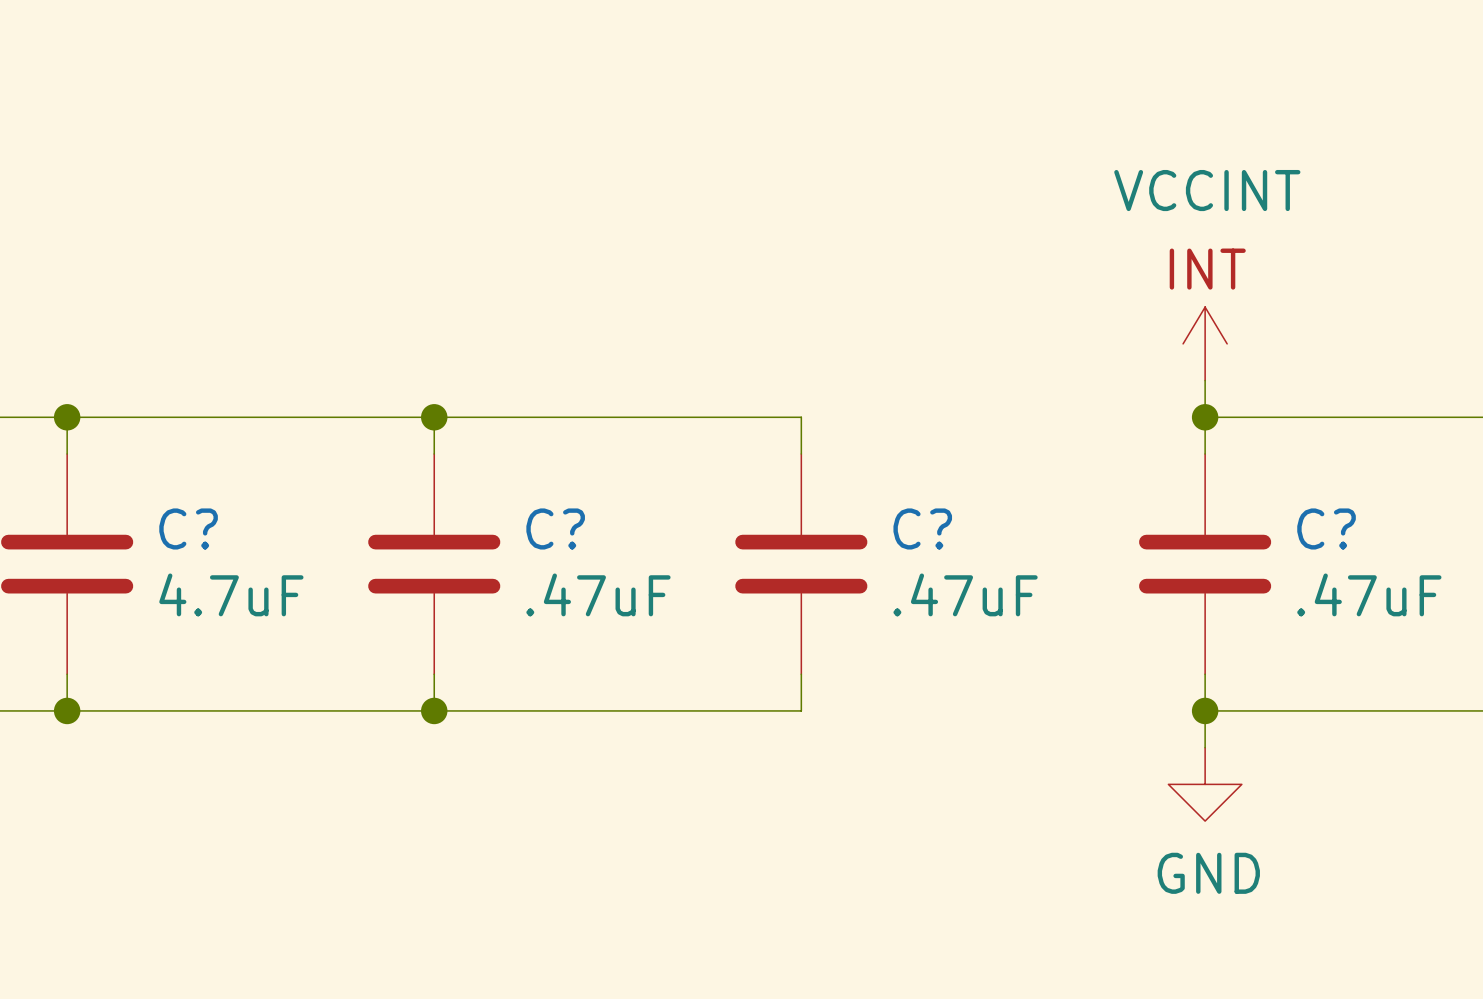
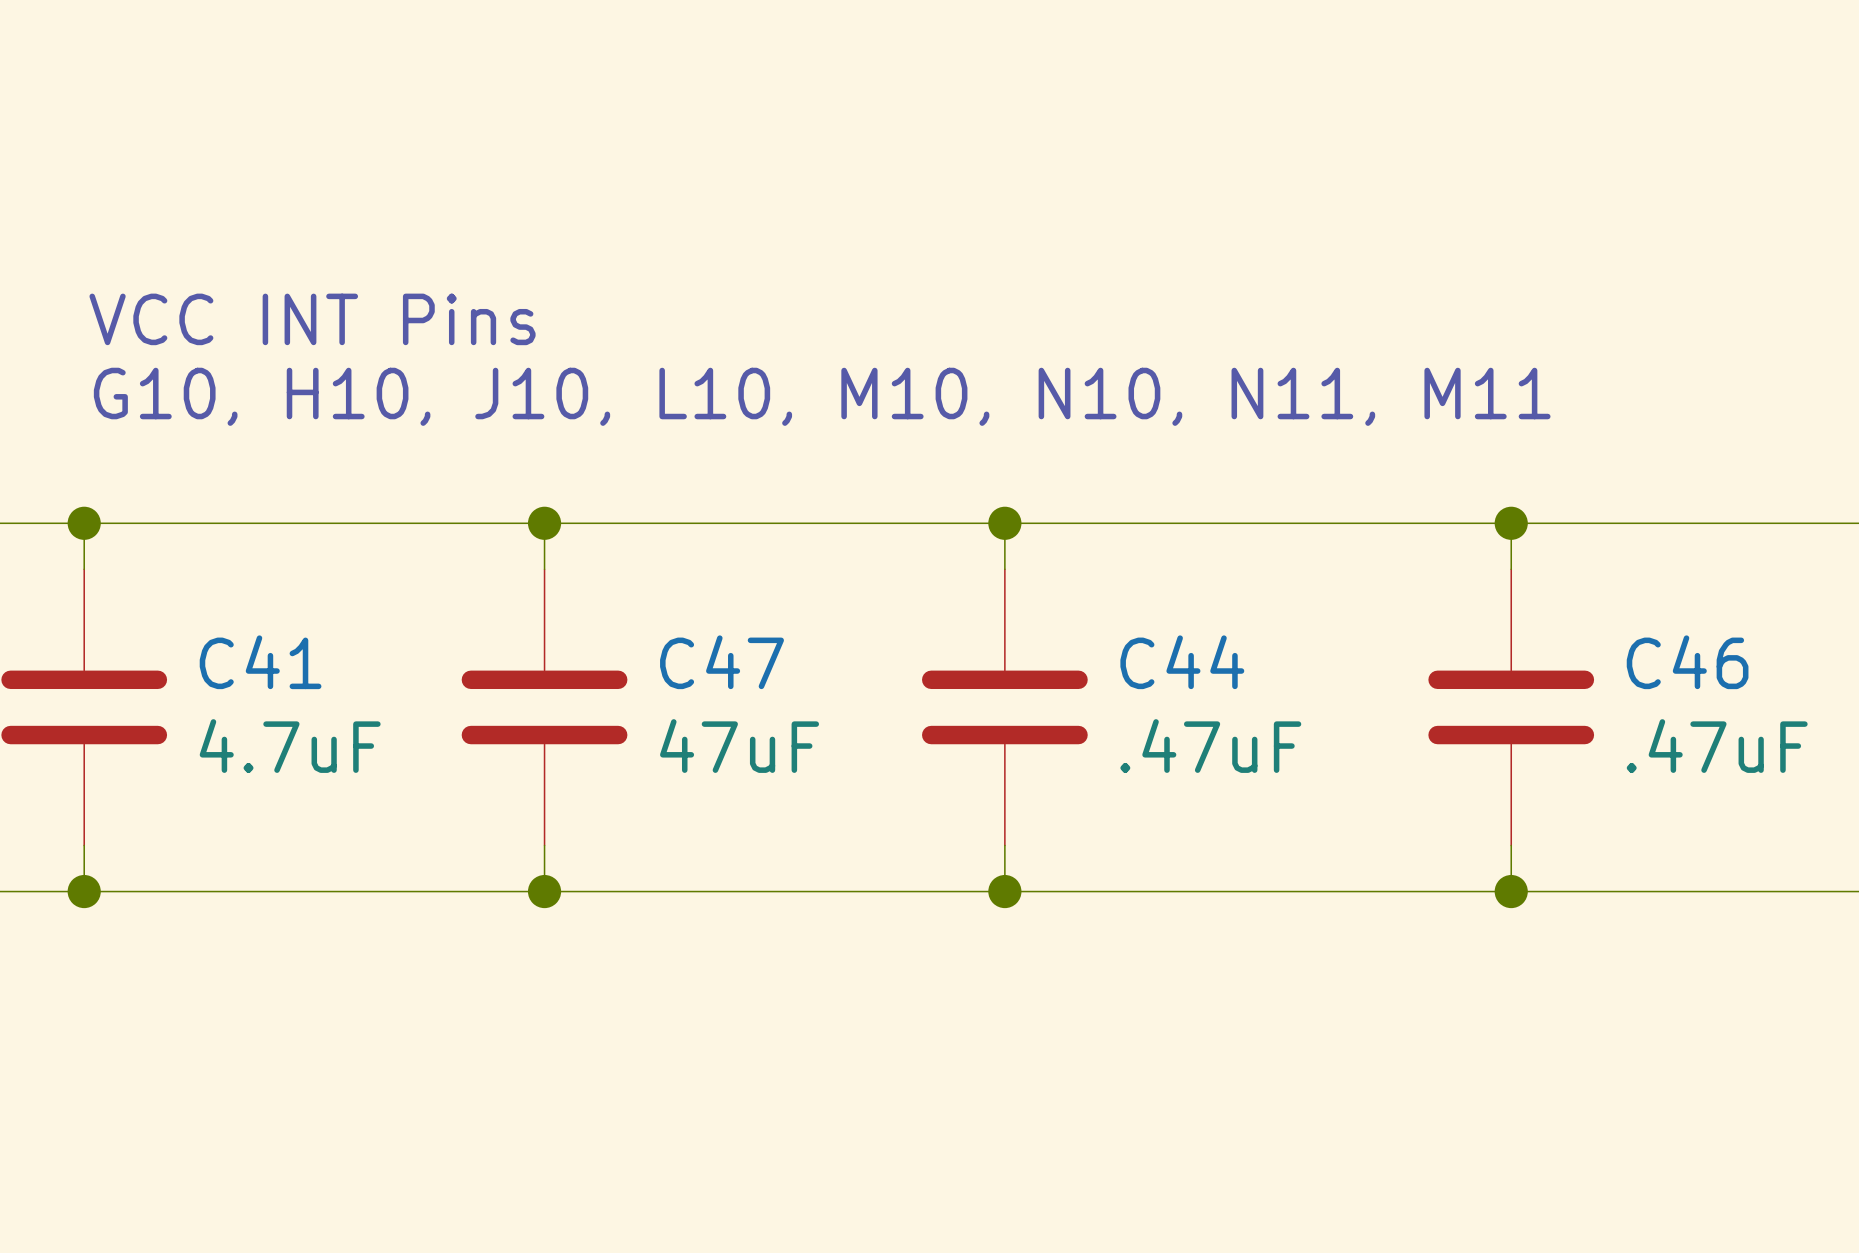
text: none -> VCC INT Pins (312, 319)
text: none -> G10, H10, J10, L10, M10, N10, N11, M11 (822, 396)
power symbol: VCCINT (1205, 343) -> none
wire: (1205, 380) (1205, 417) -> (1004, 523) (1511, 523)
junction: none -> (1004, 523)
C? name: C? (188, 528) -> C41 (260, 662)
C? name: C? (555, 528) -> C47 (722, 662)
C? name: C? (922, 528) -> C44 (1182, 662)
C? name: C? (1326, 528) -> C46 (1687, 662)
C? value: .47uF (598, 594) -> 47uF (739, 746)
junction: none -> (1004, 891)
wire: (1205, 710) (1205, 747) -> (1511, 891) (1004, 891)
power symbol: GND (1205, 784) -> none

